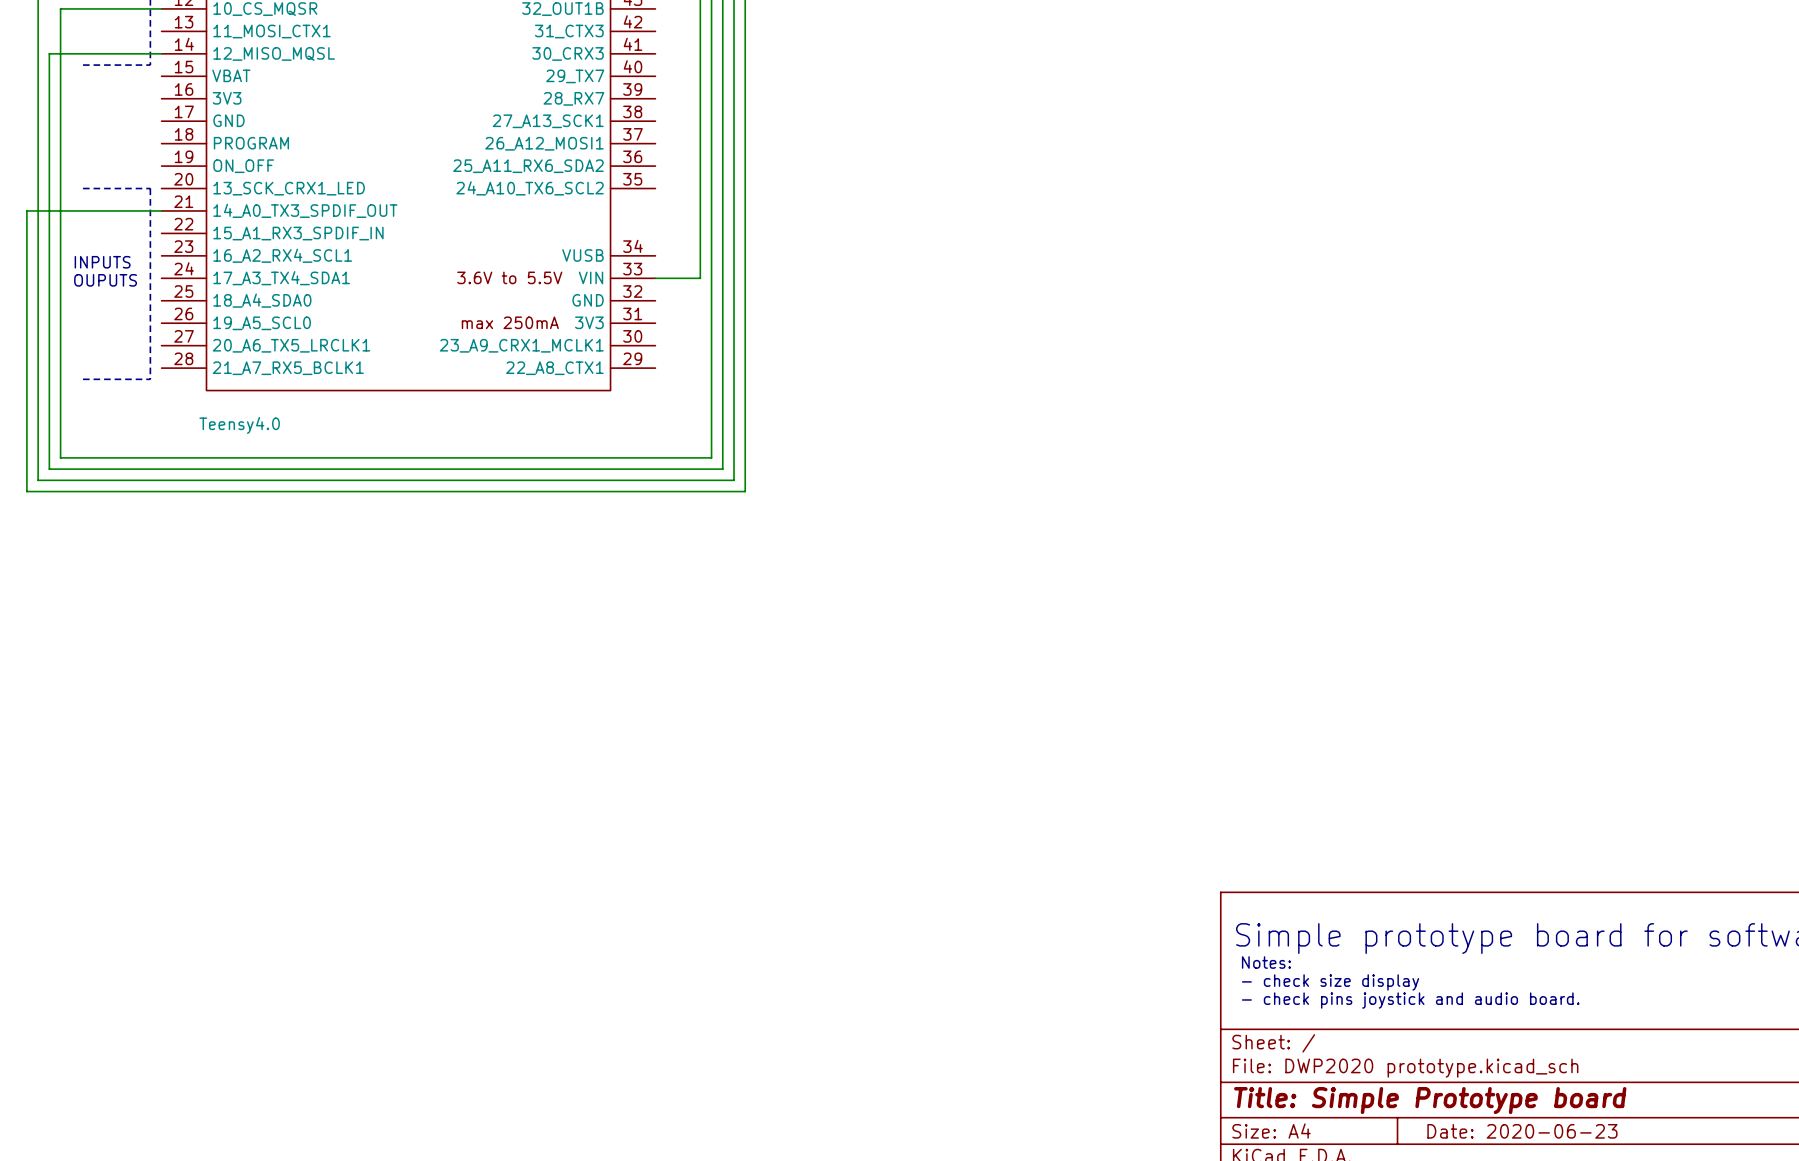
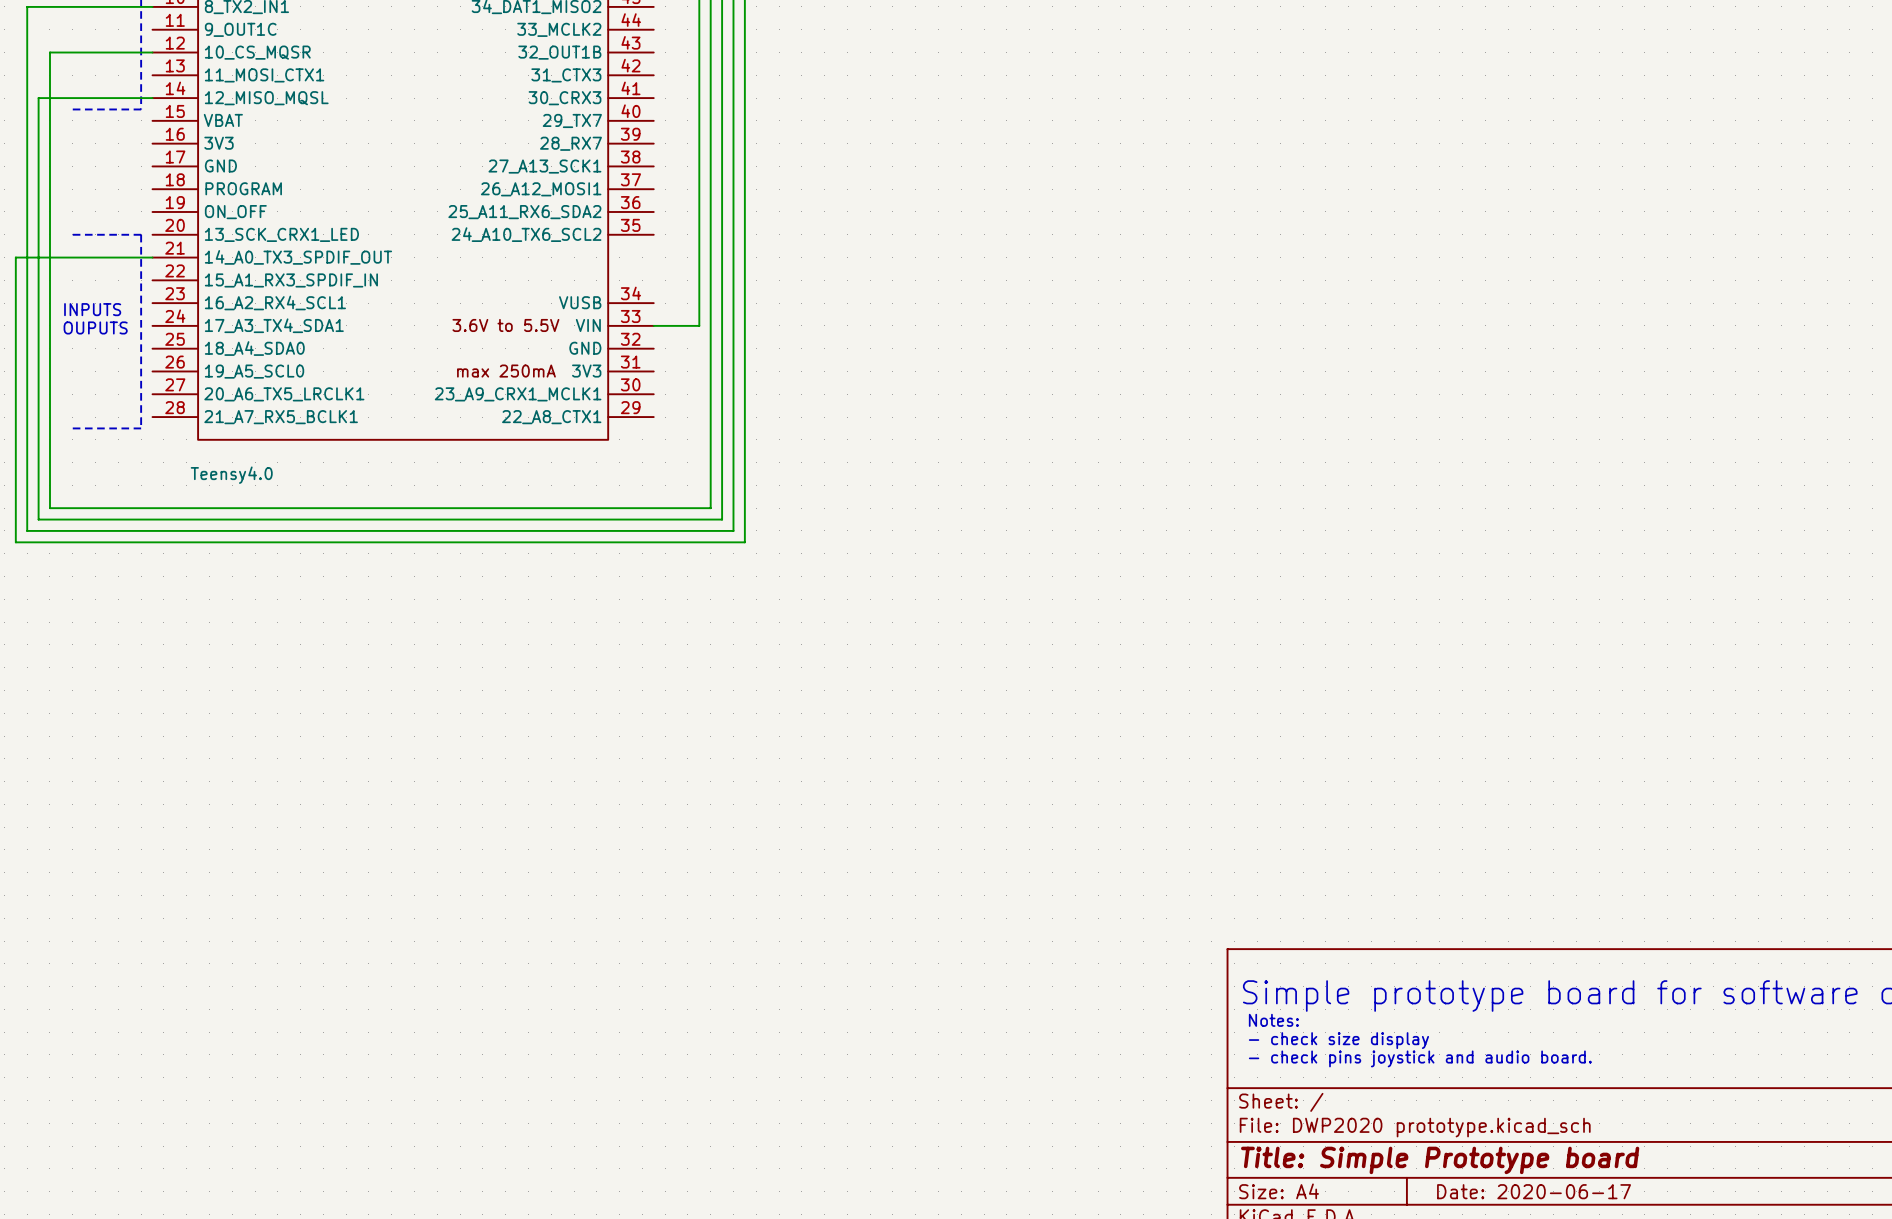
title block: Date: 2020-06-23 (1522, 1131) -> Date: 2020-06-17 (1534, 1191)

